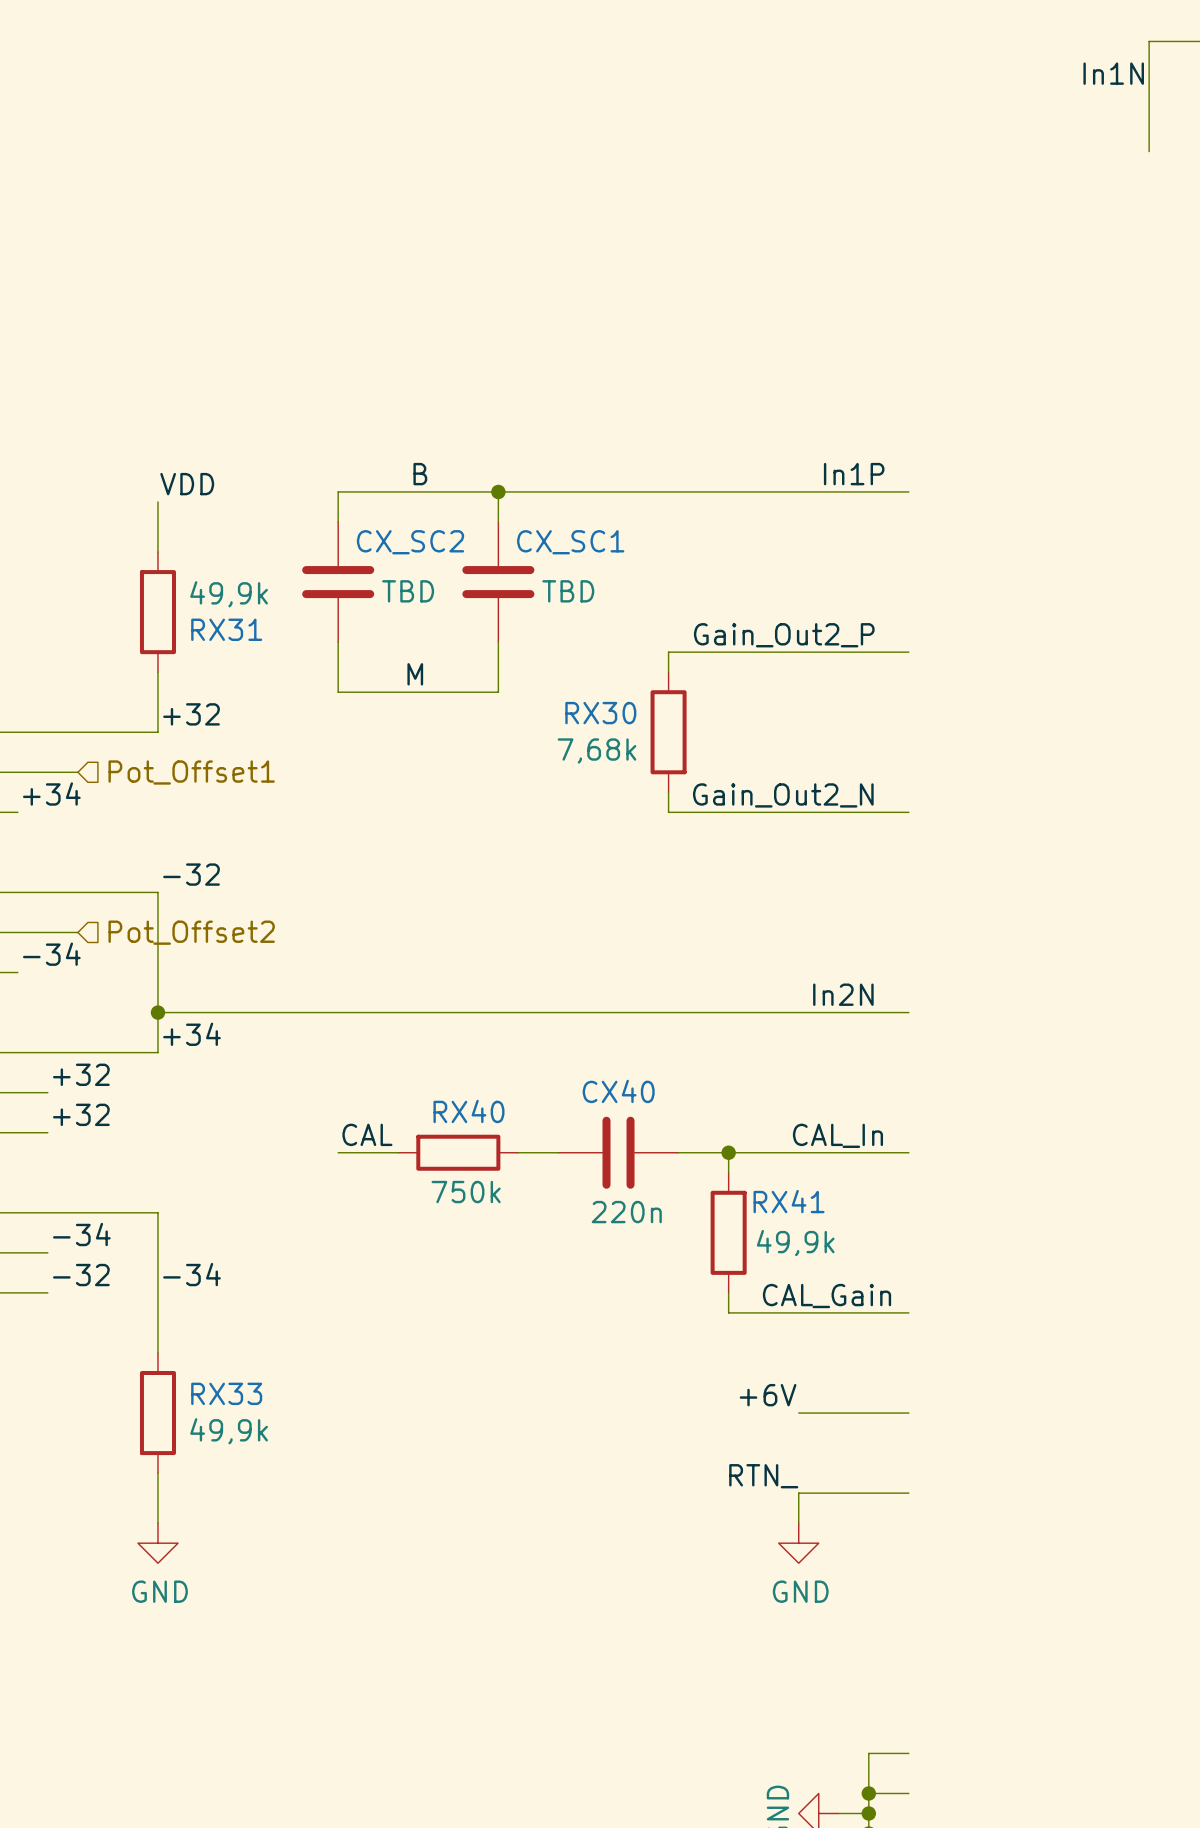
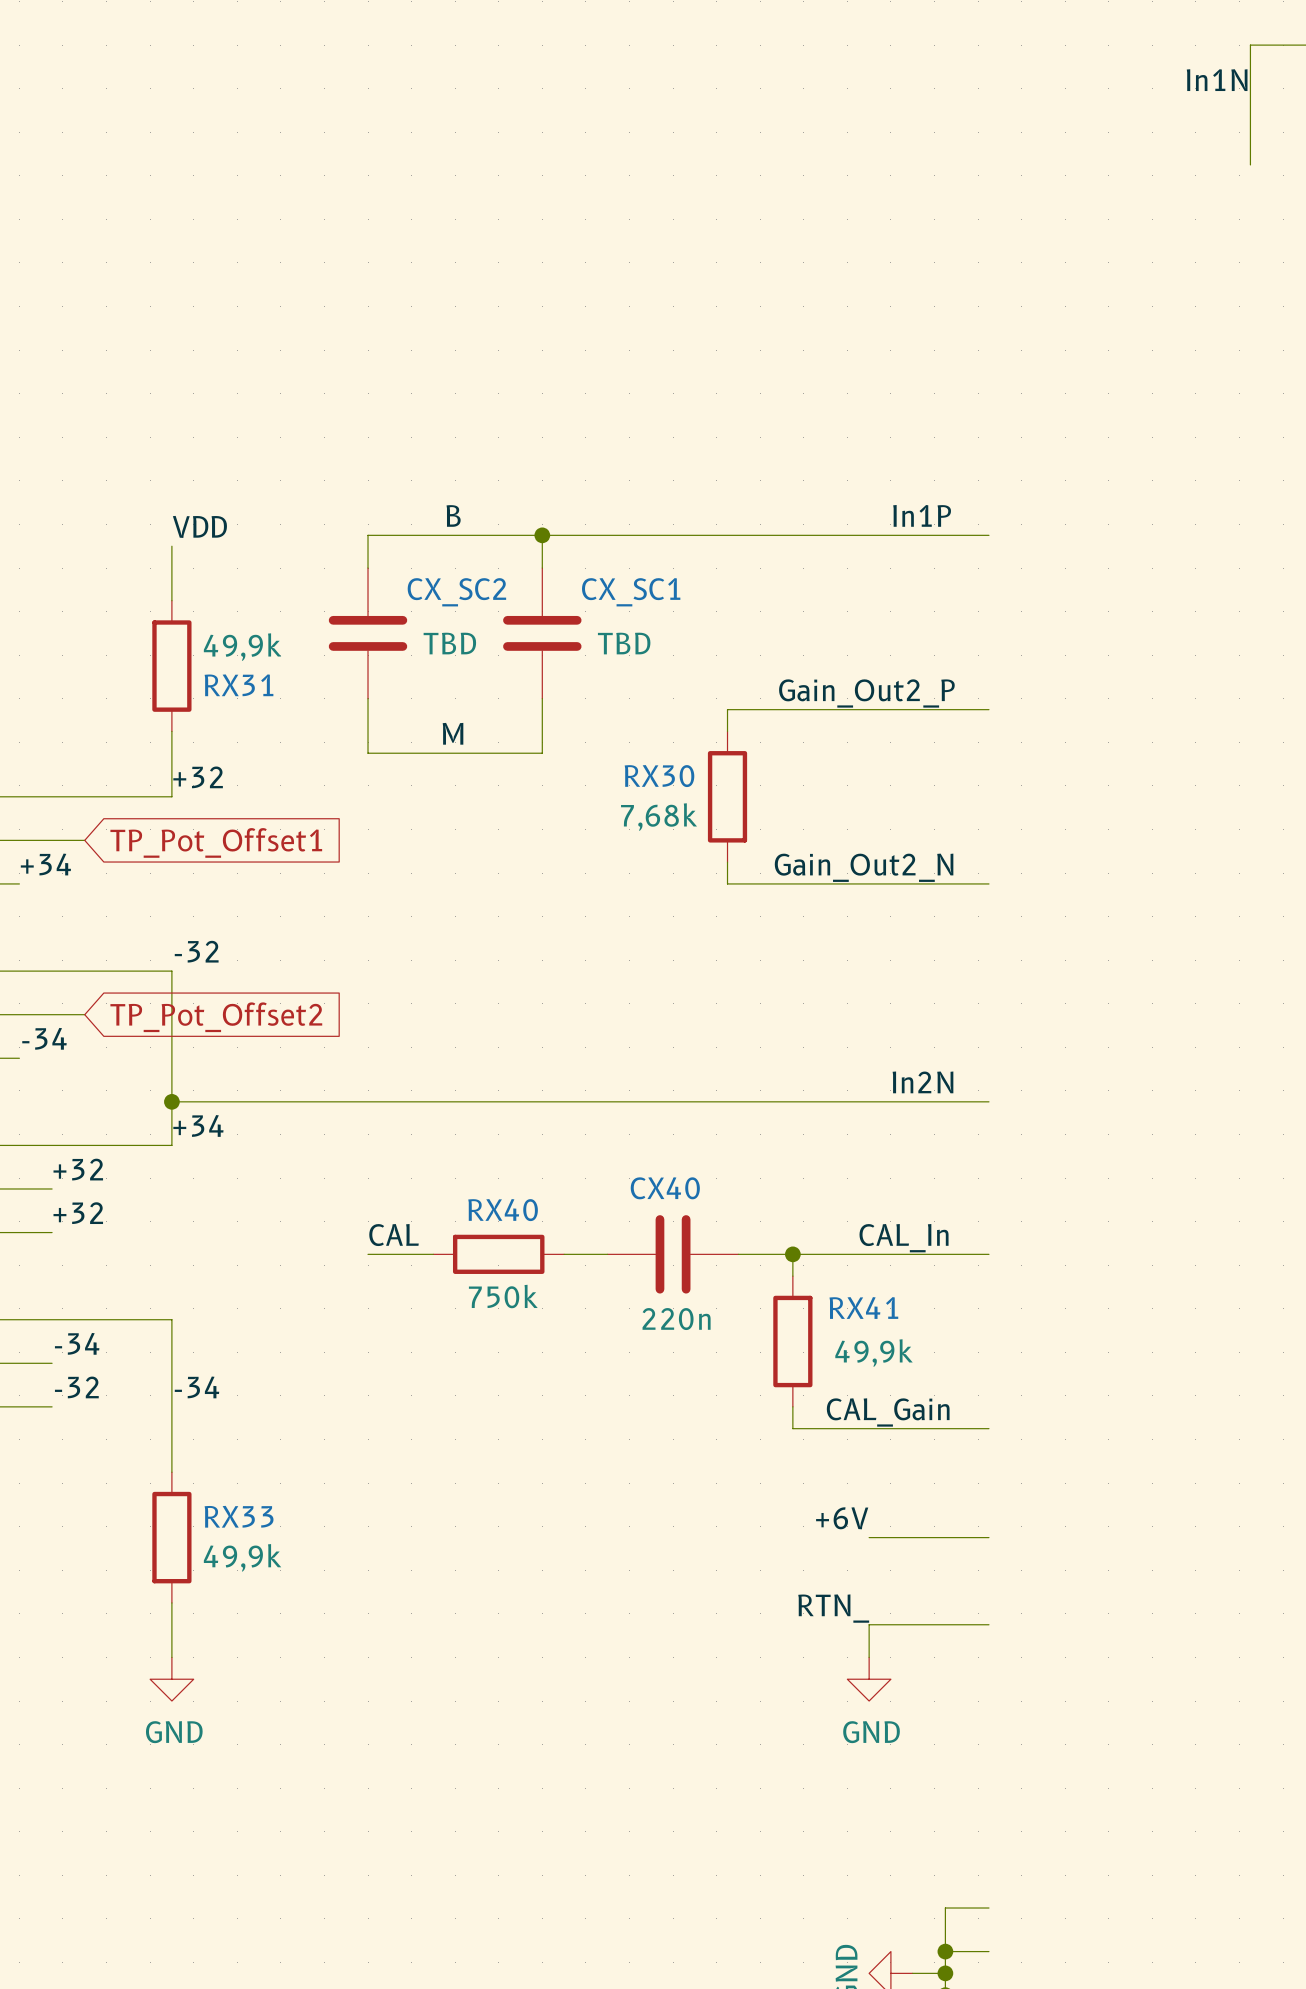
hierarchical label: Pot_Offset1 (191, 772) -> none
global label: none -> TP_Pot_Offset1 (216, 842)
hierarchical label: Pot_Offset2 (191, 932) -> none
global label: none -> TP_Pot_Offset2 (216, 1017)

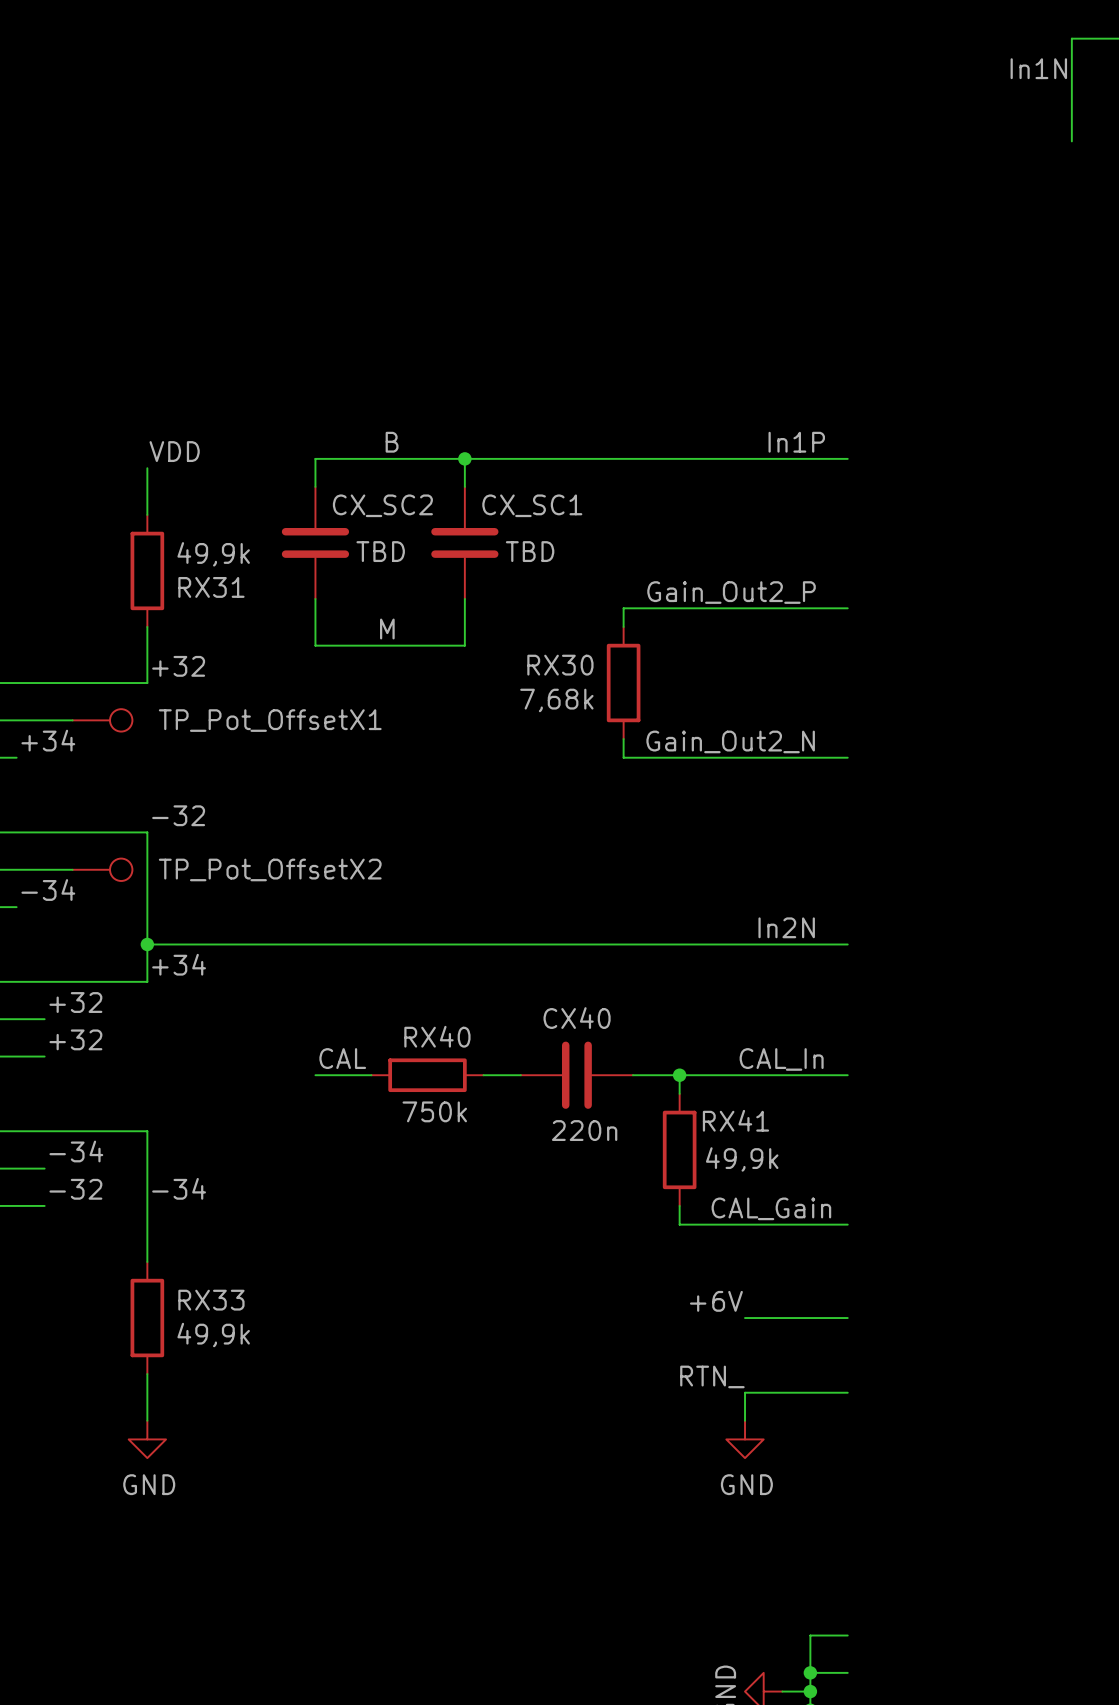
TP_Pot_OffsetX1: none -> (102, 720)
global label: TP_Pot_Offset1 (216, 842) -> none
TP_Pot_OffsetX2: none -> (102, 869)
global label: TP_Pot_Offset2 (216, 1017) -> none

